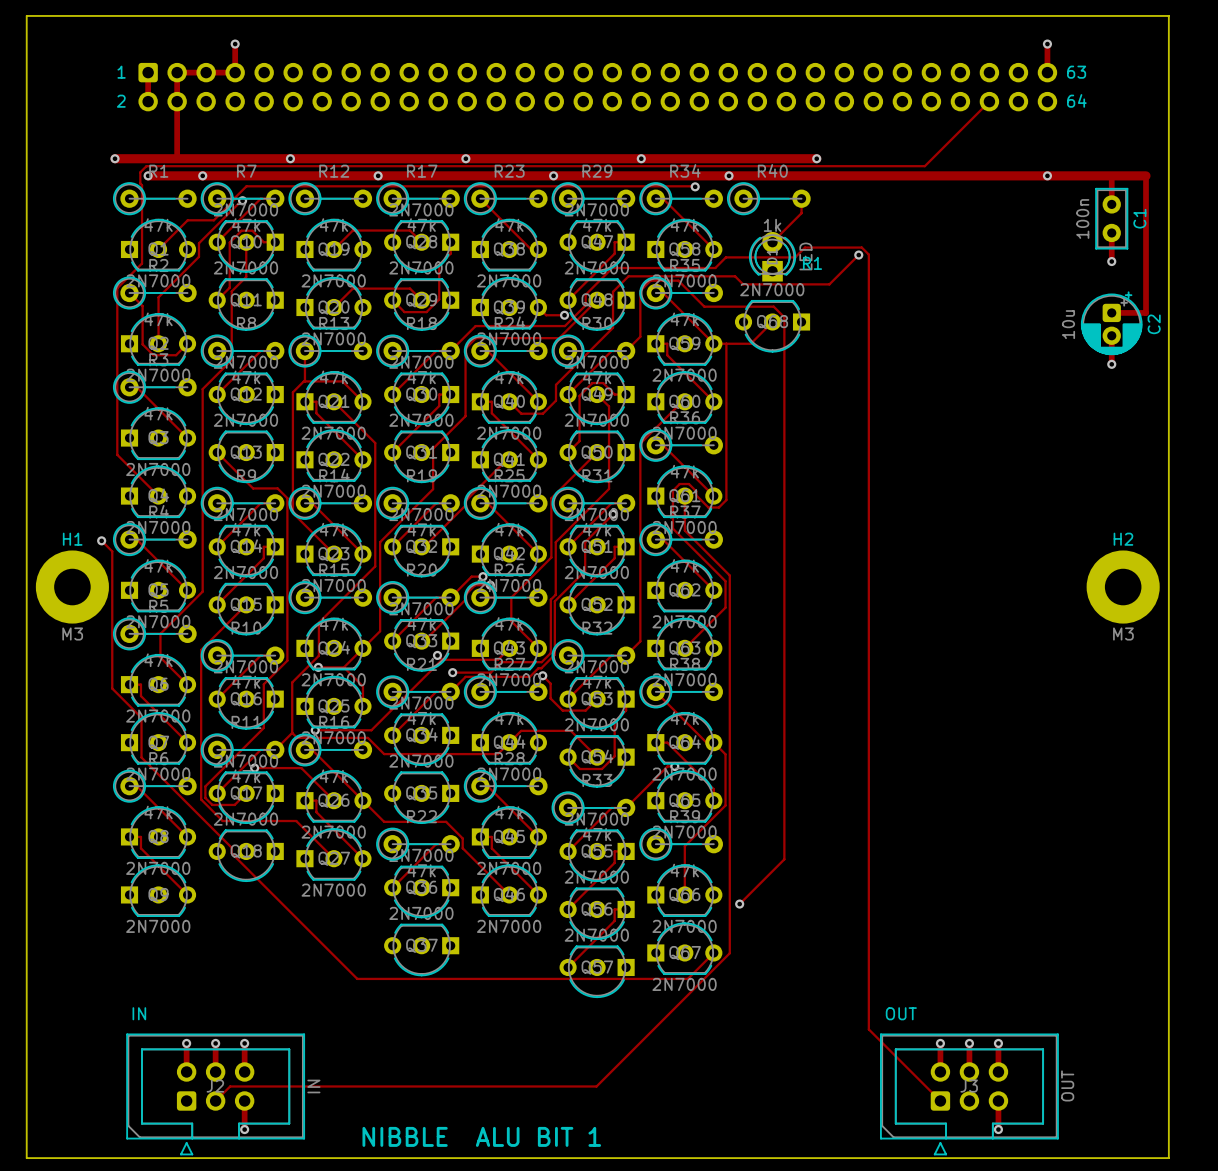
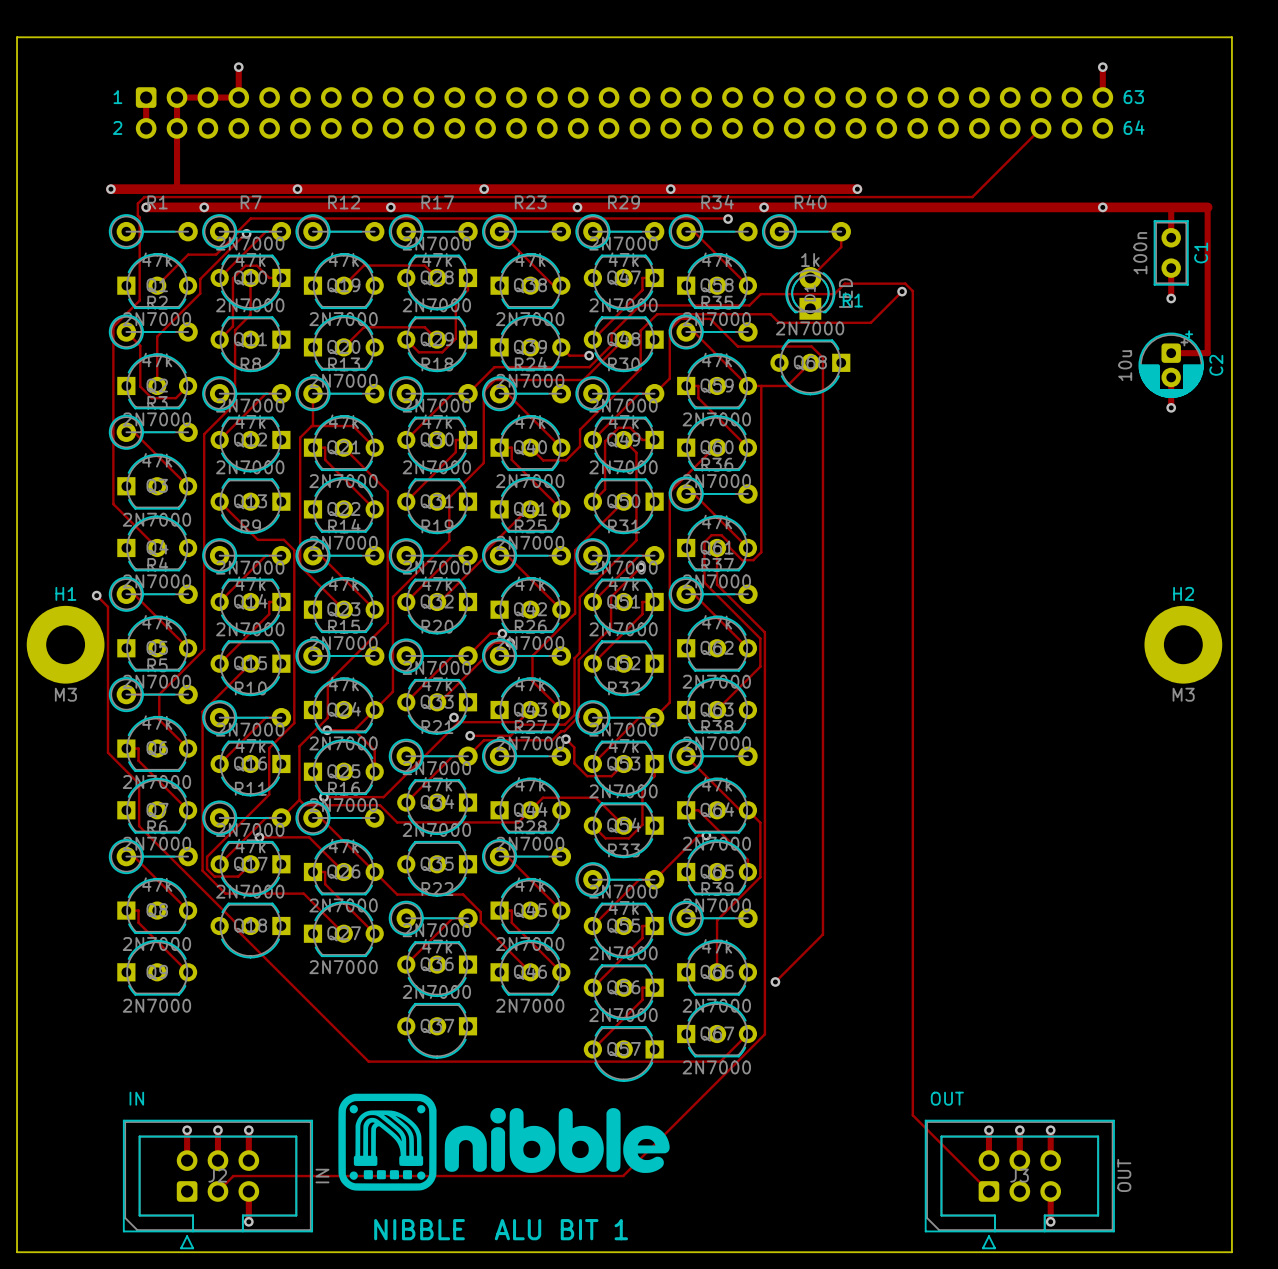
drawing: none -> [338, 1093, 670, 1191]

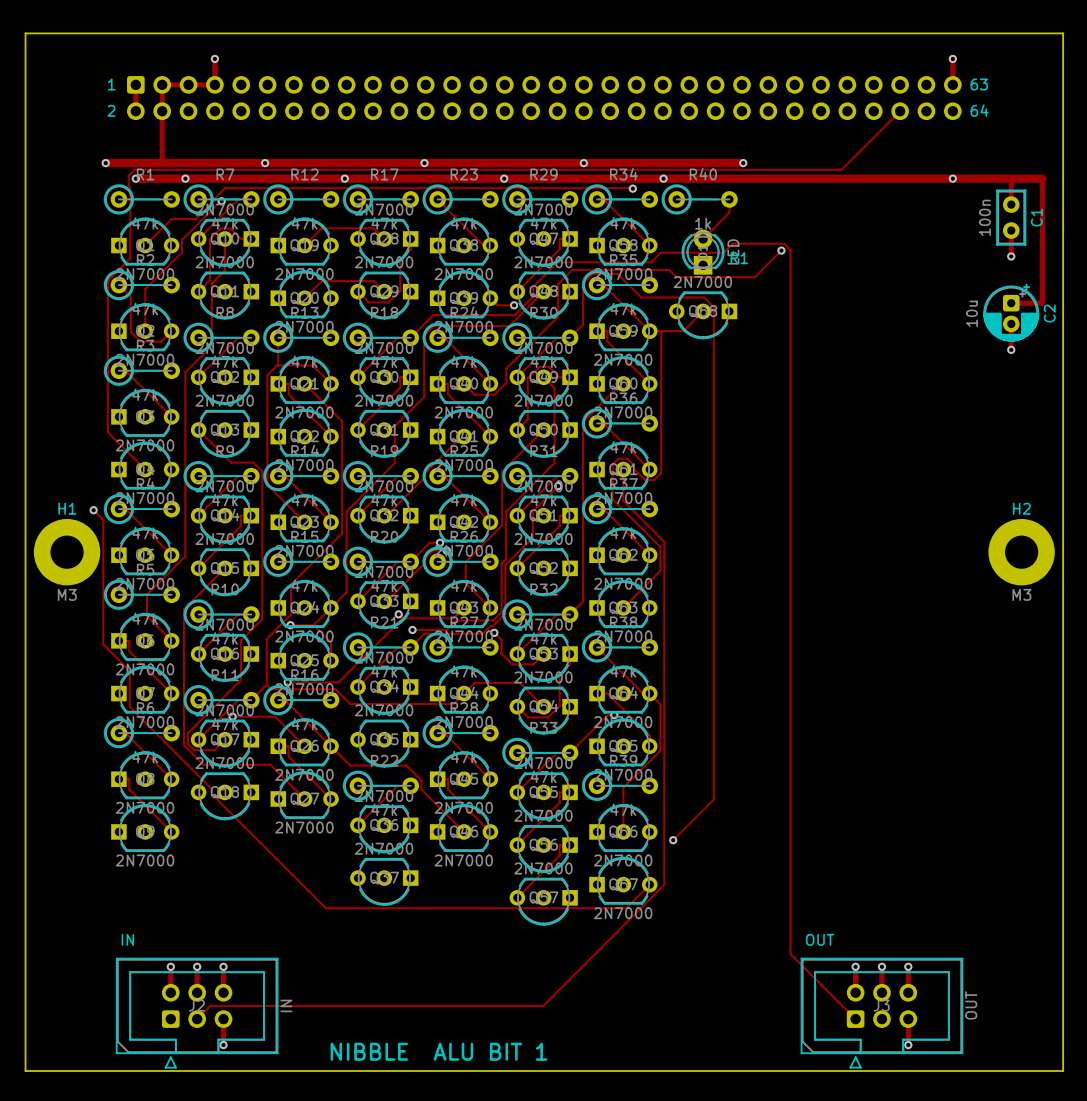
drawing: [338, 1093, 670, 1191] -> none

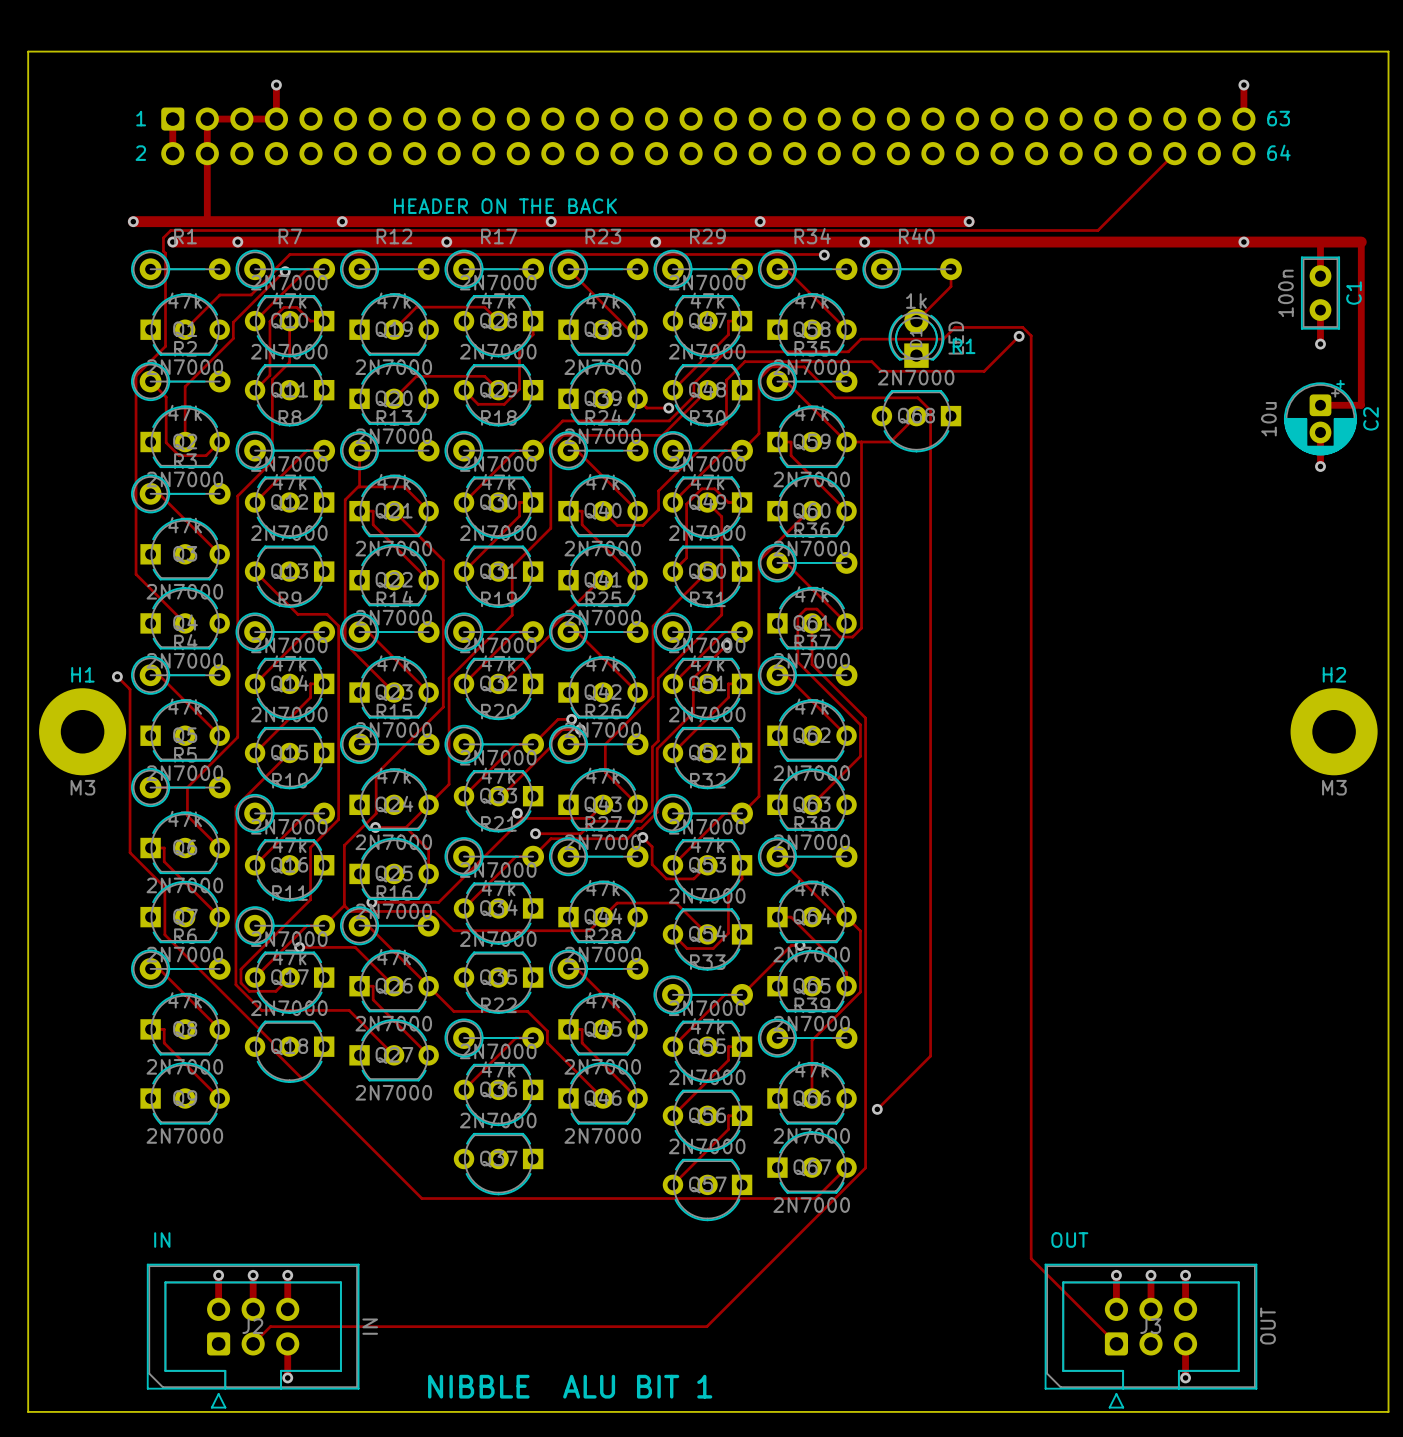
text: none -> HEADER ON THE BACK (505, 206)

